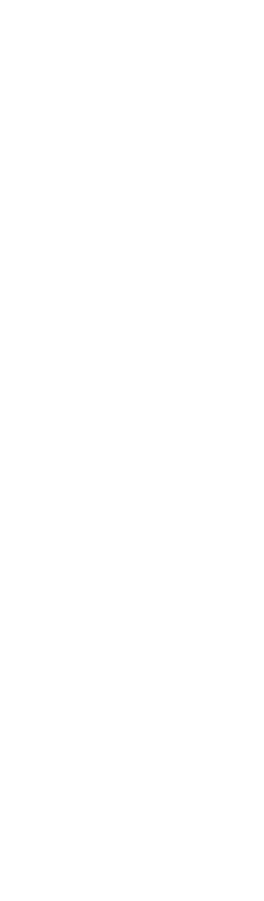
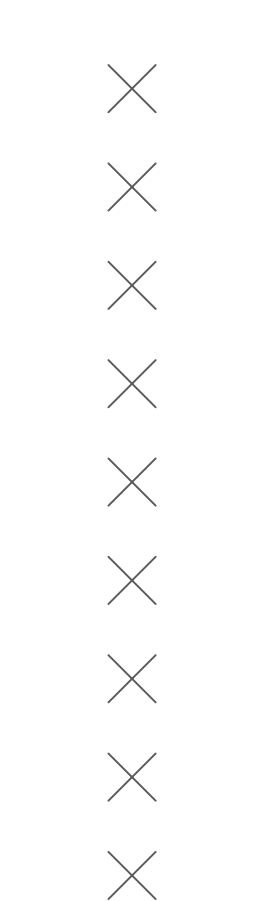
no-connect mark: none -> (132, 88)
no-connect mark: none -> (132, 186)
no-connect mark: none -> (132, 285)
no-connect mark: none -> (132, 383)
no-connect mark: none -> (132, 482)
no-connect mark: none -> (132, 580)
no-connect mark: none -> (132, 678)
no-connect mark: none -> (132, 777)
no-connect mark: none -> (132, 875)

